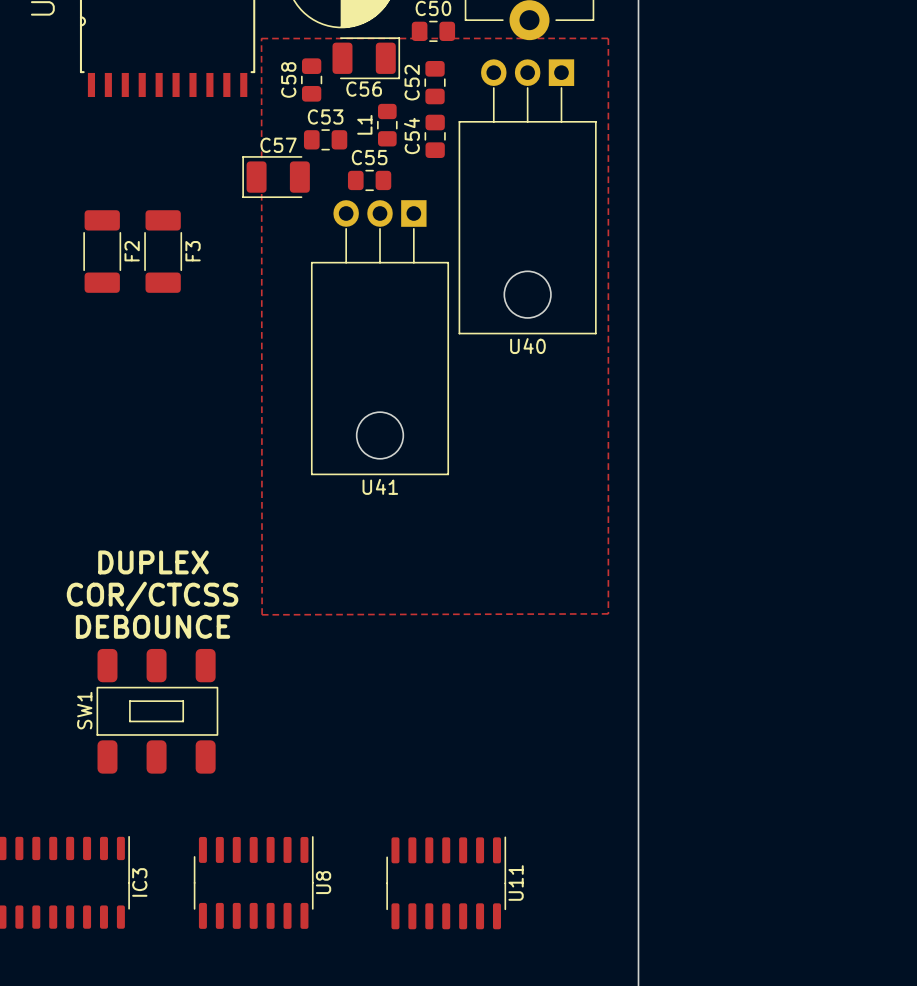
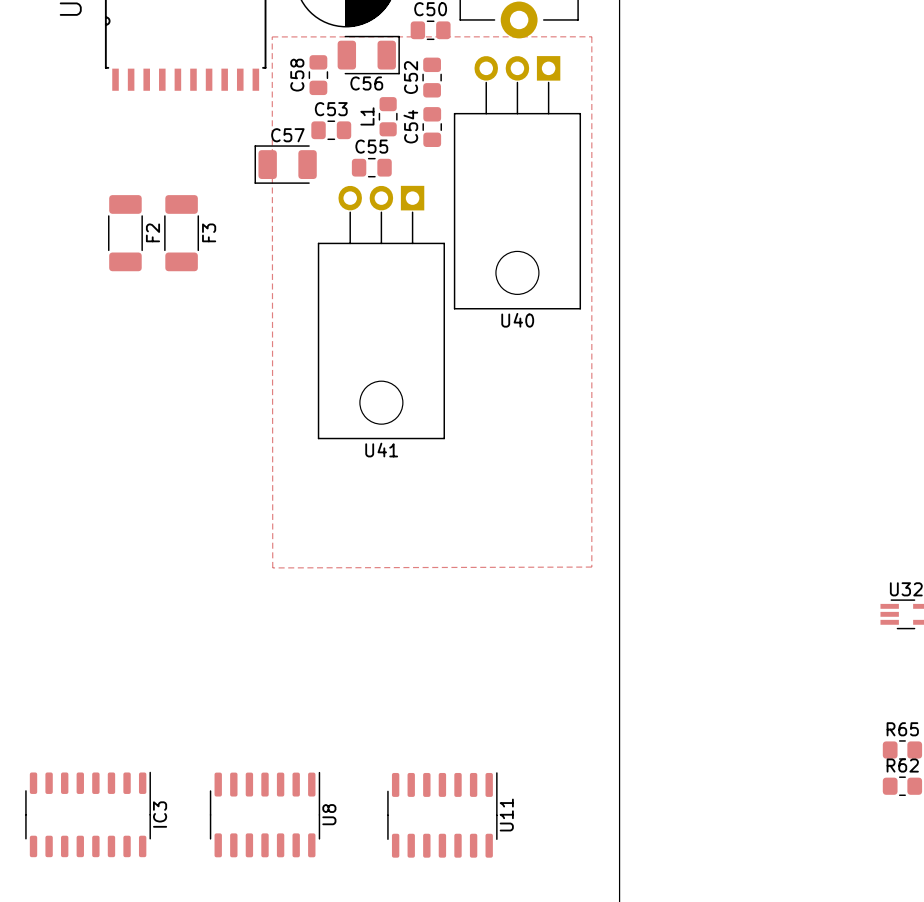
text: DUPLEX (153, 562) -> none
text: COR/CTCSS (152, 596) -> none
text: DEBOUNCE (153, 626) -> none
SW1: (157, 711) -> none

